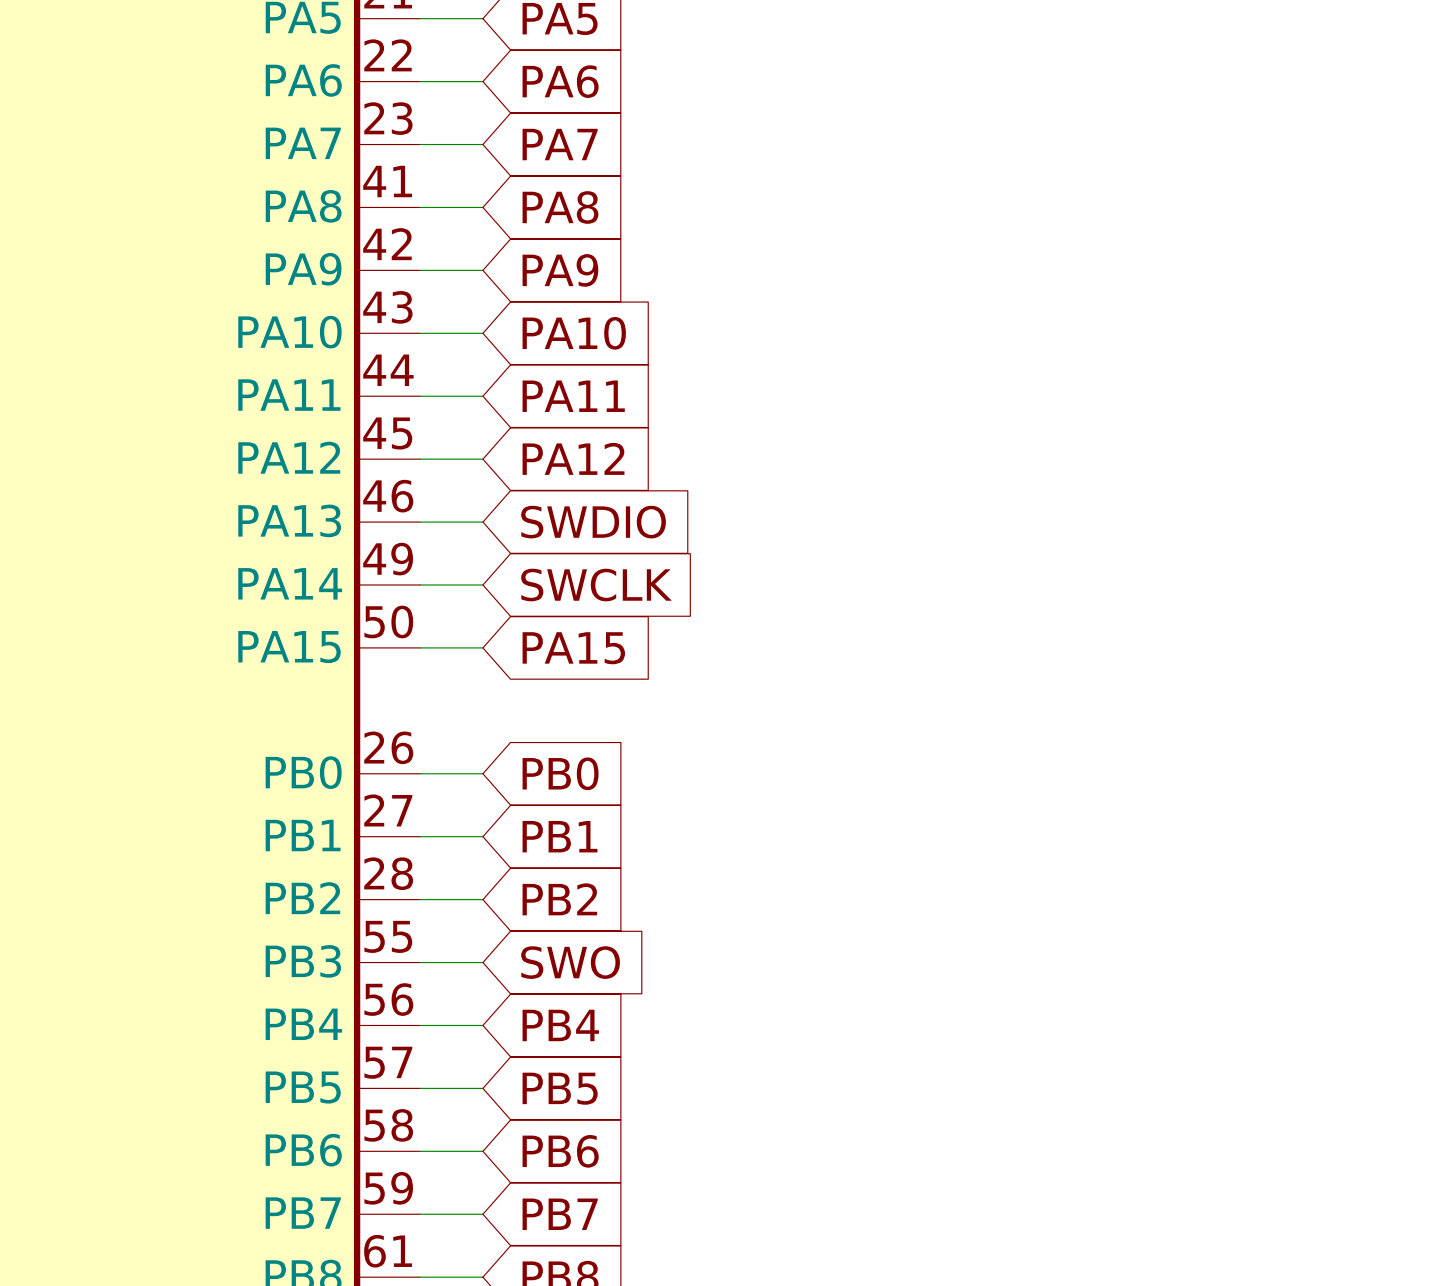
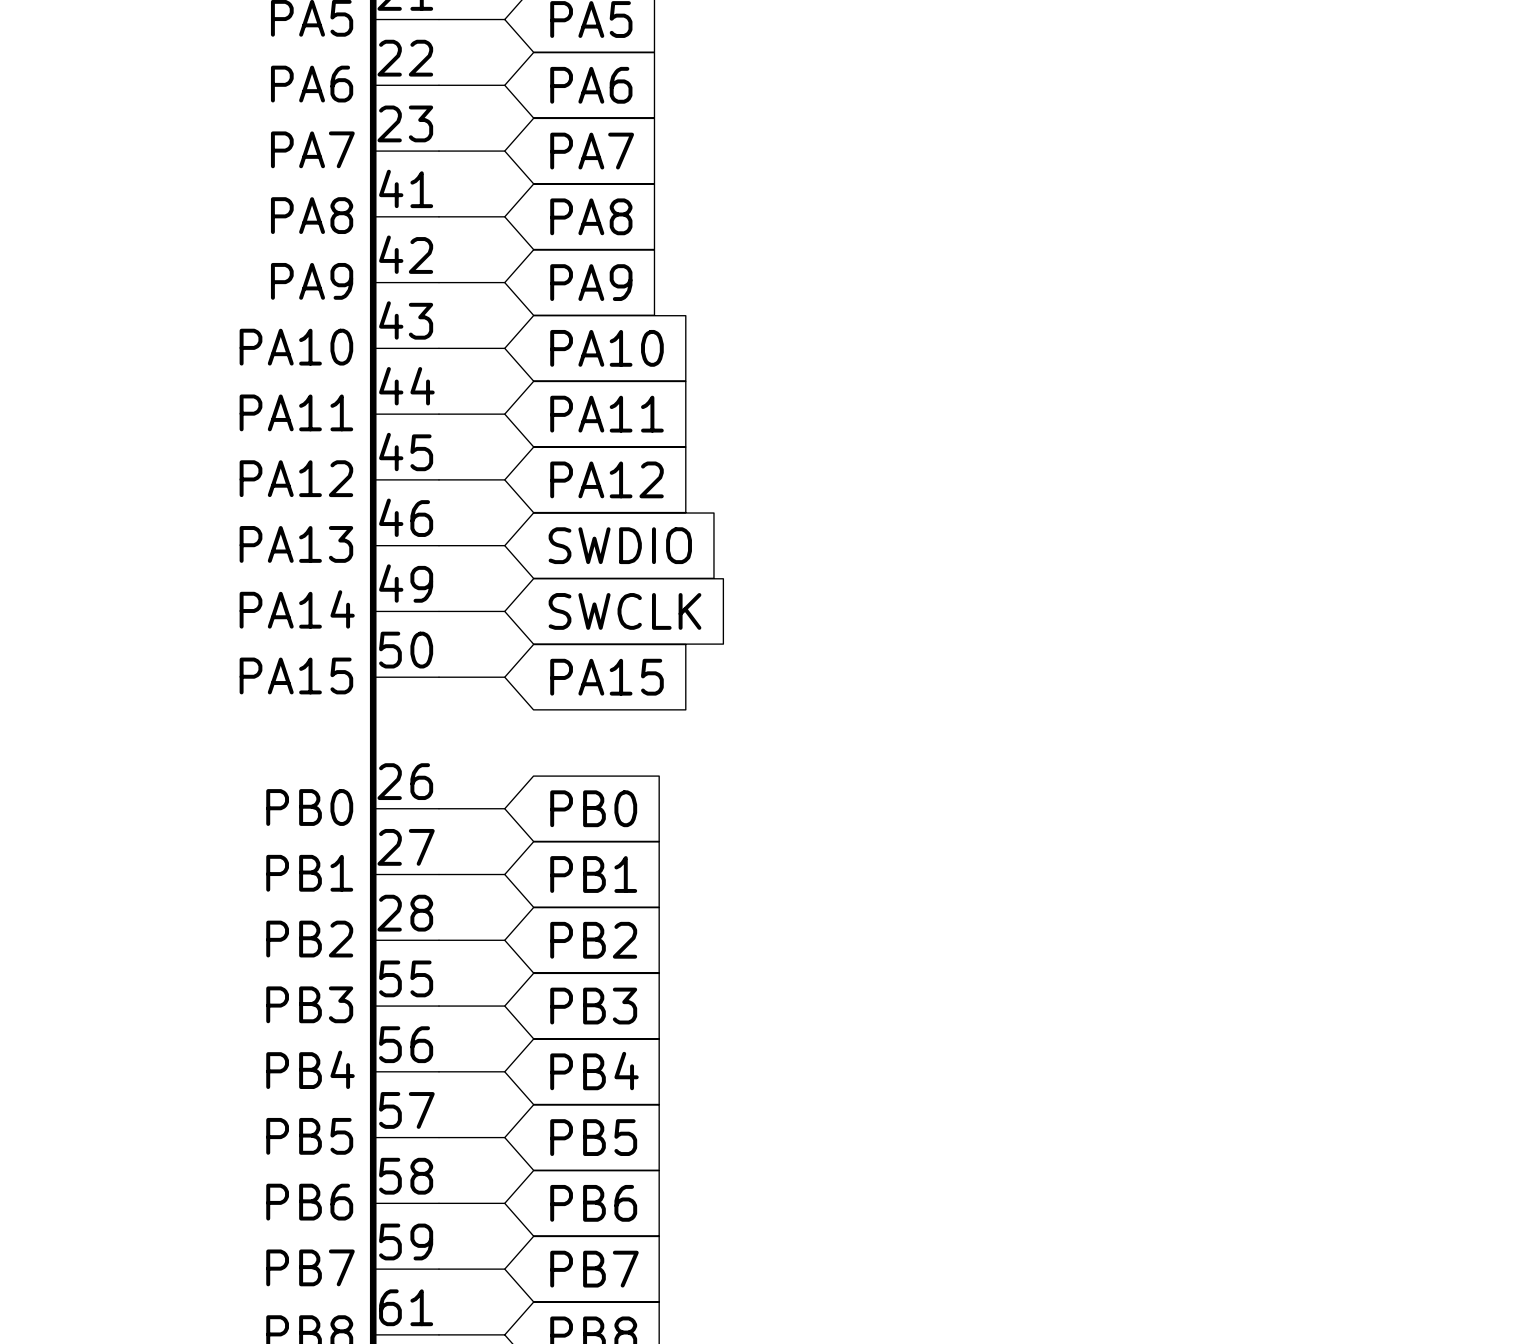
global label: SWO (570, 962) -> PB3 (593, 1006)

